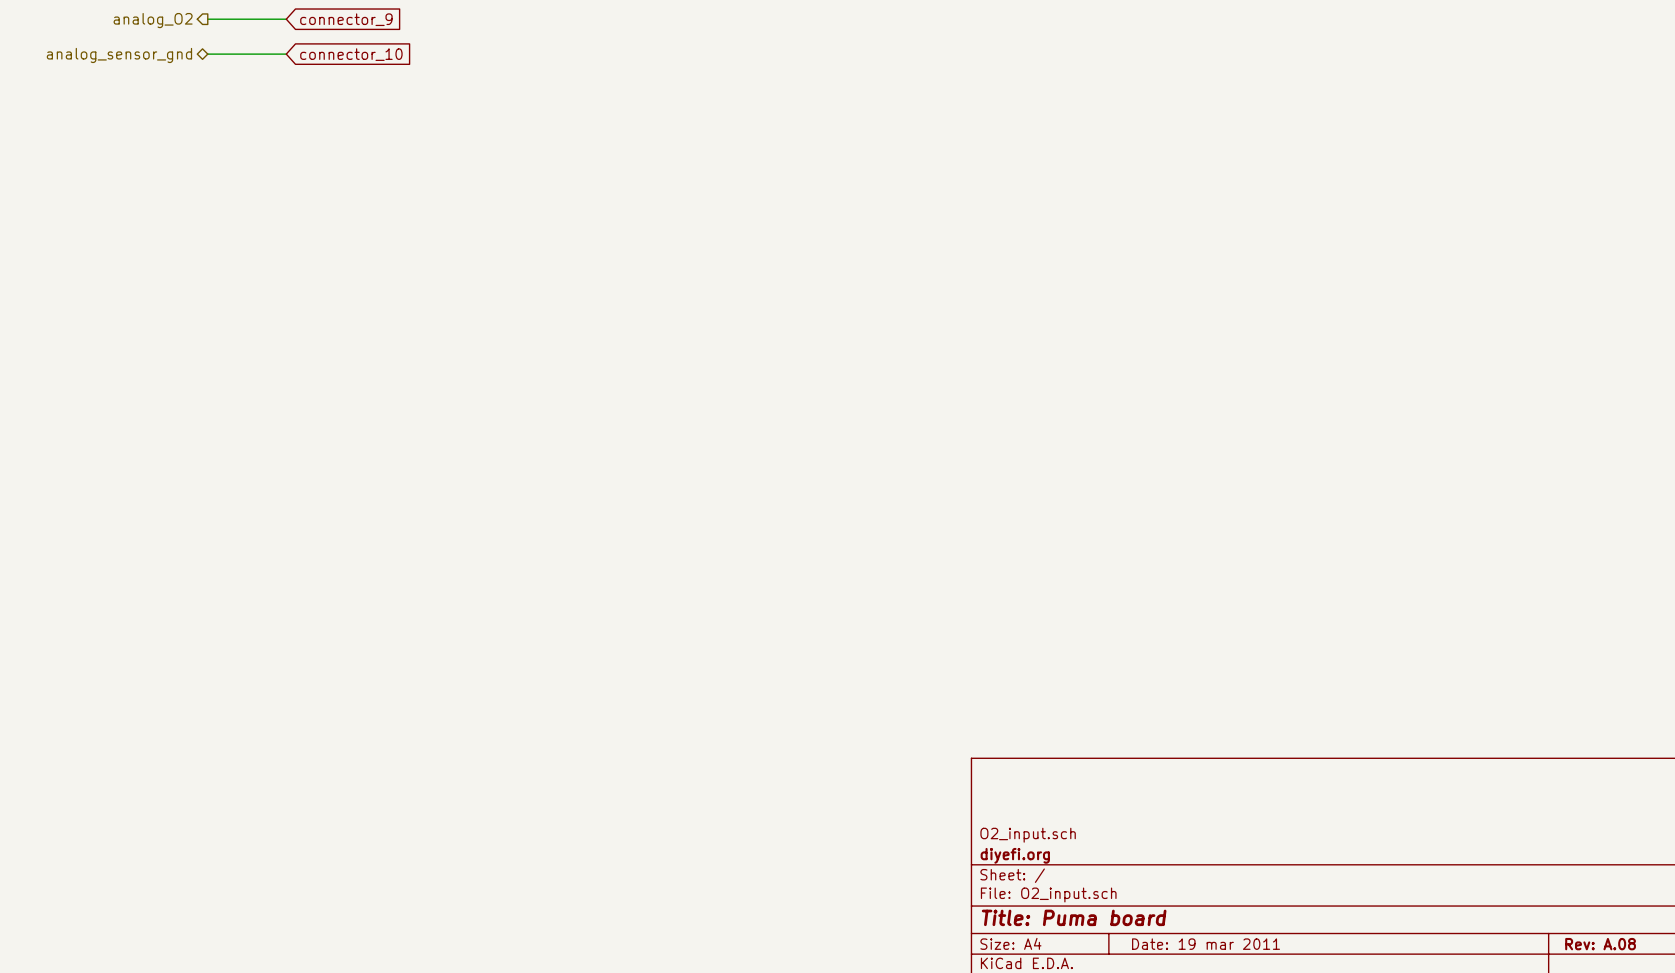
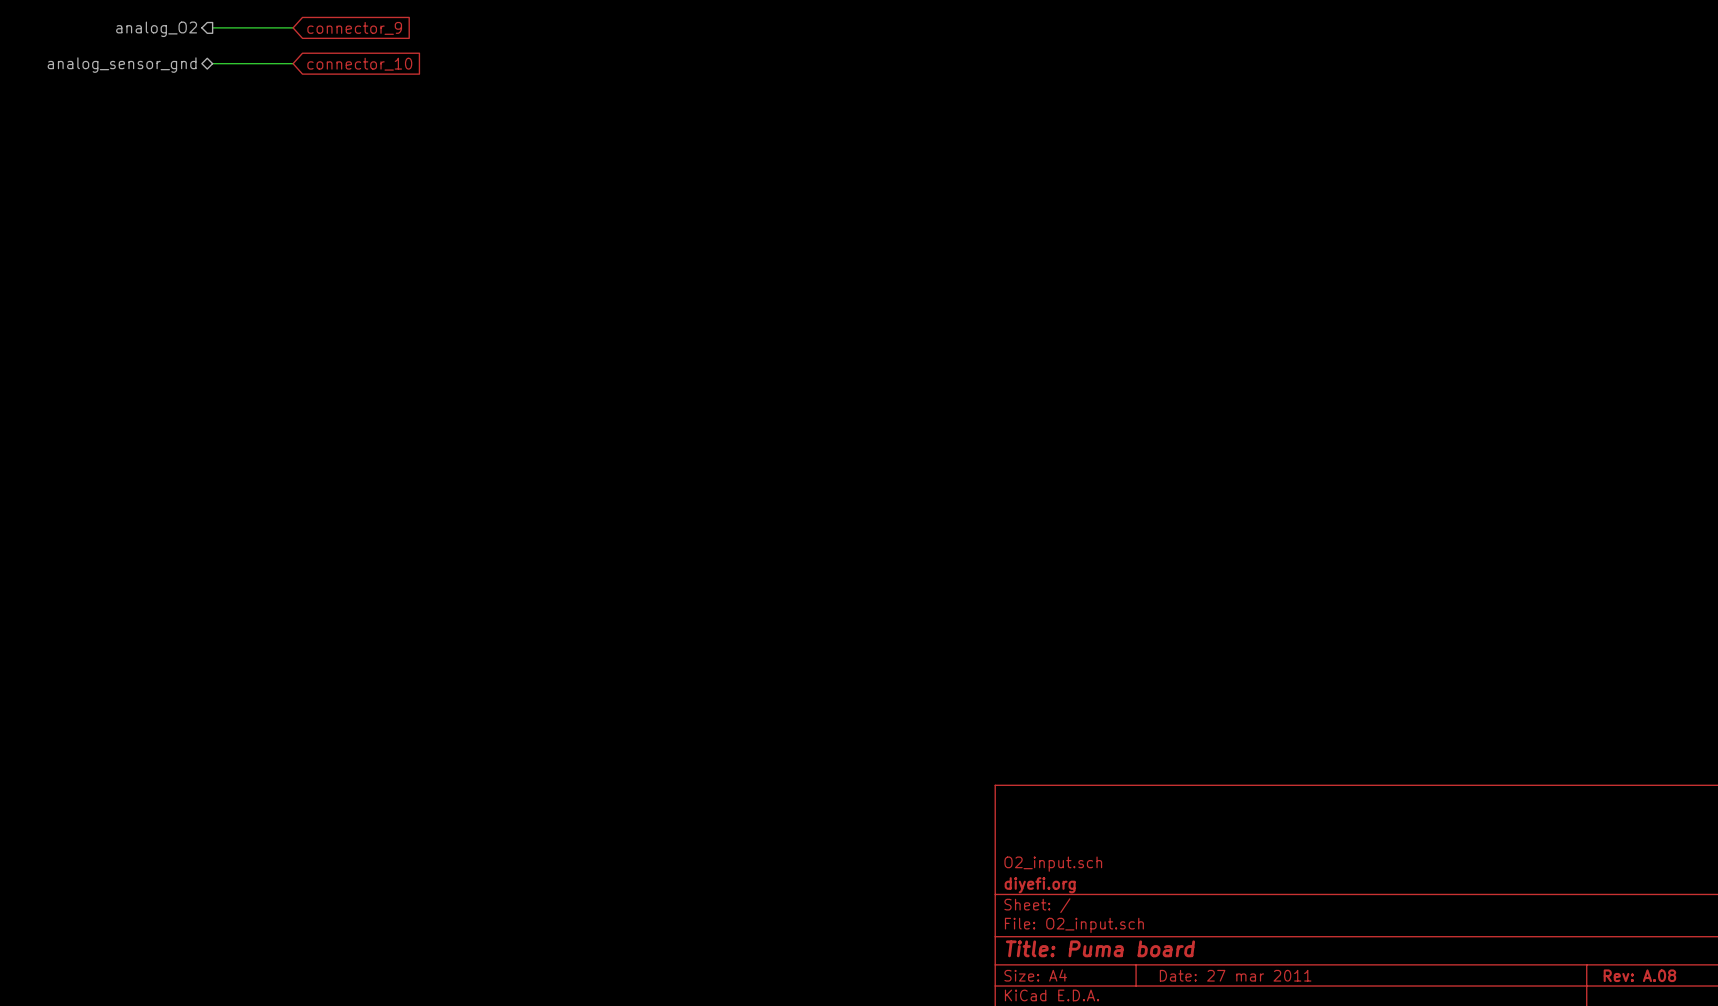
title block: Date: 19 mar 2011 (1206, 944) -> Date: 27 mar 2011 (1235, 975)

